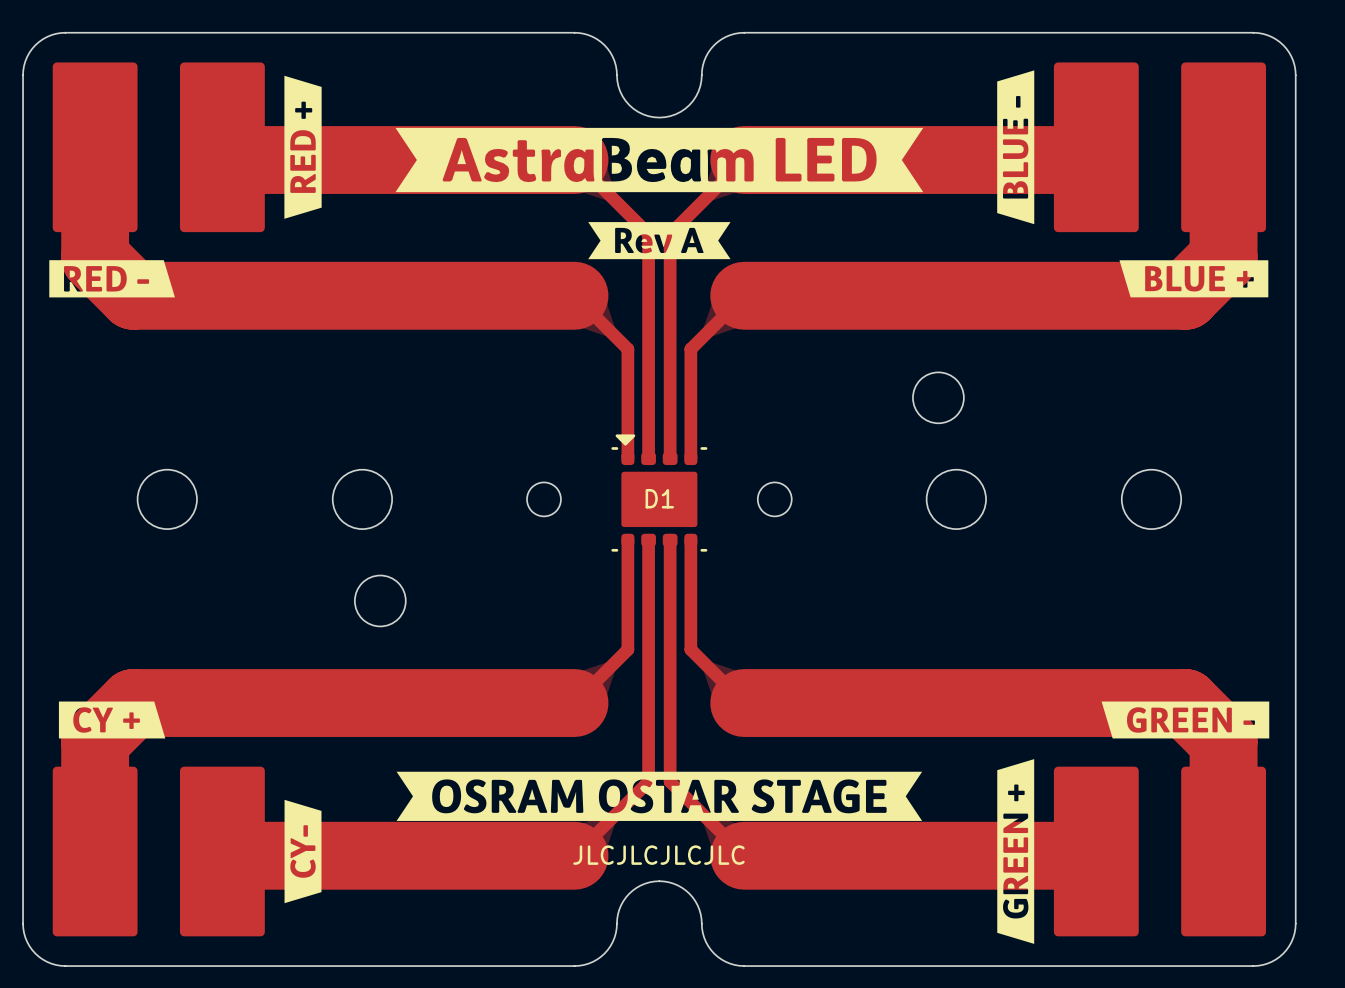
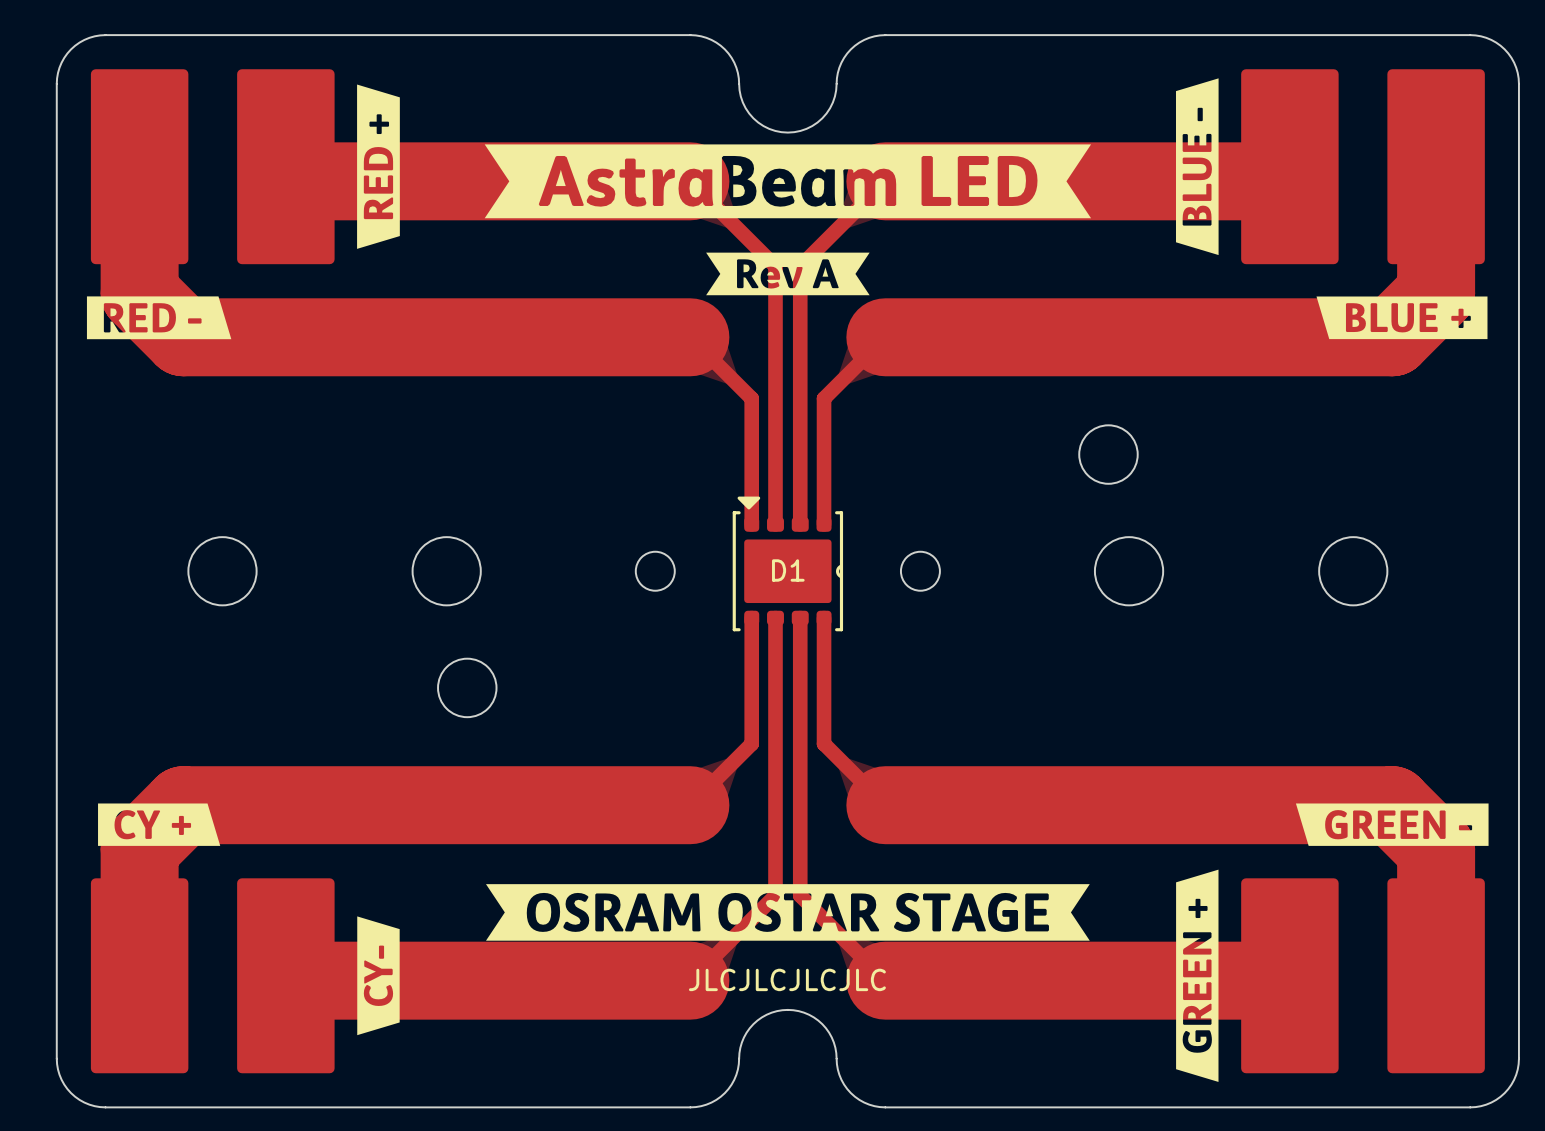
D1 footprint: [611, 434, 708, 552] -> [732, 496, 844, 632]

